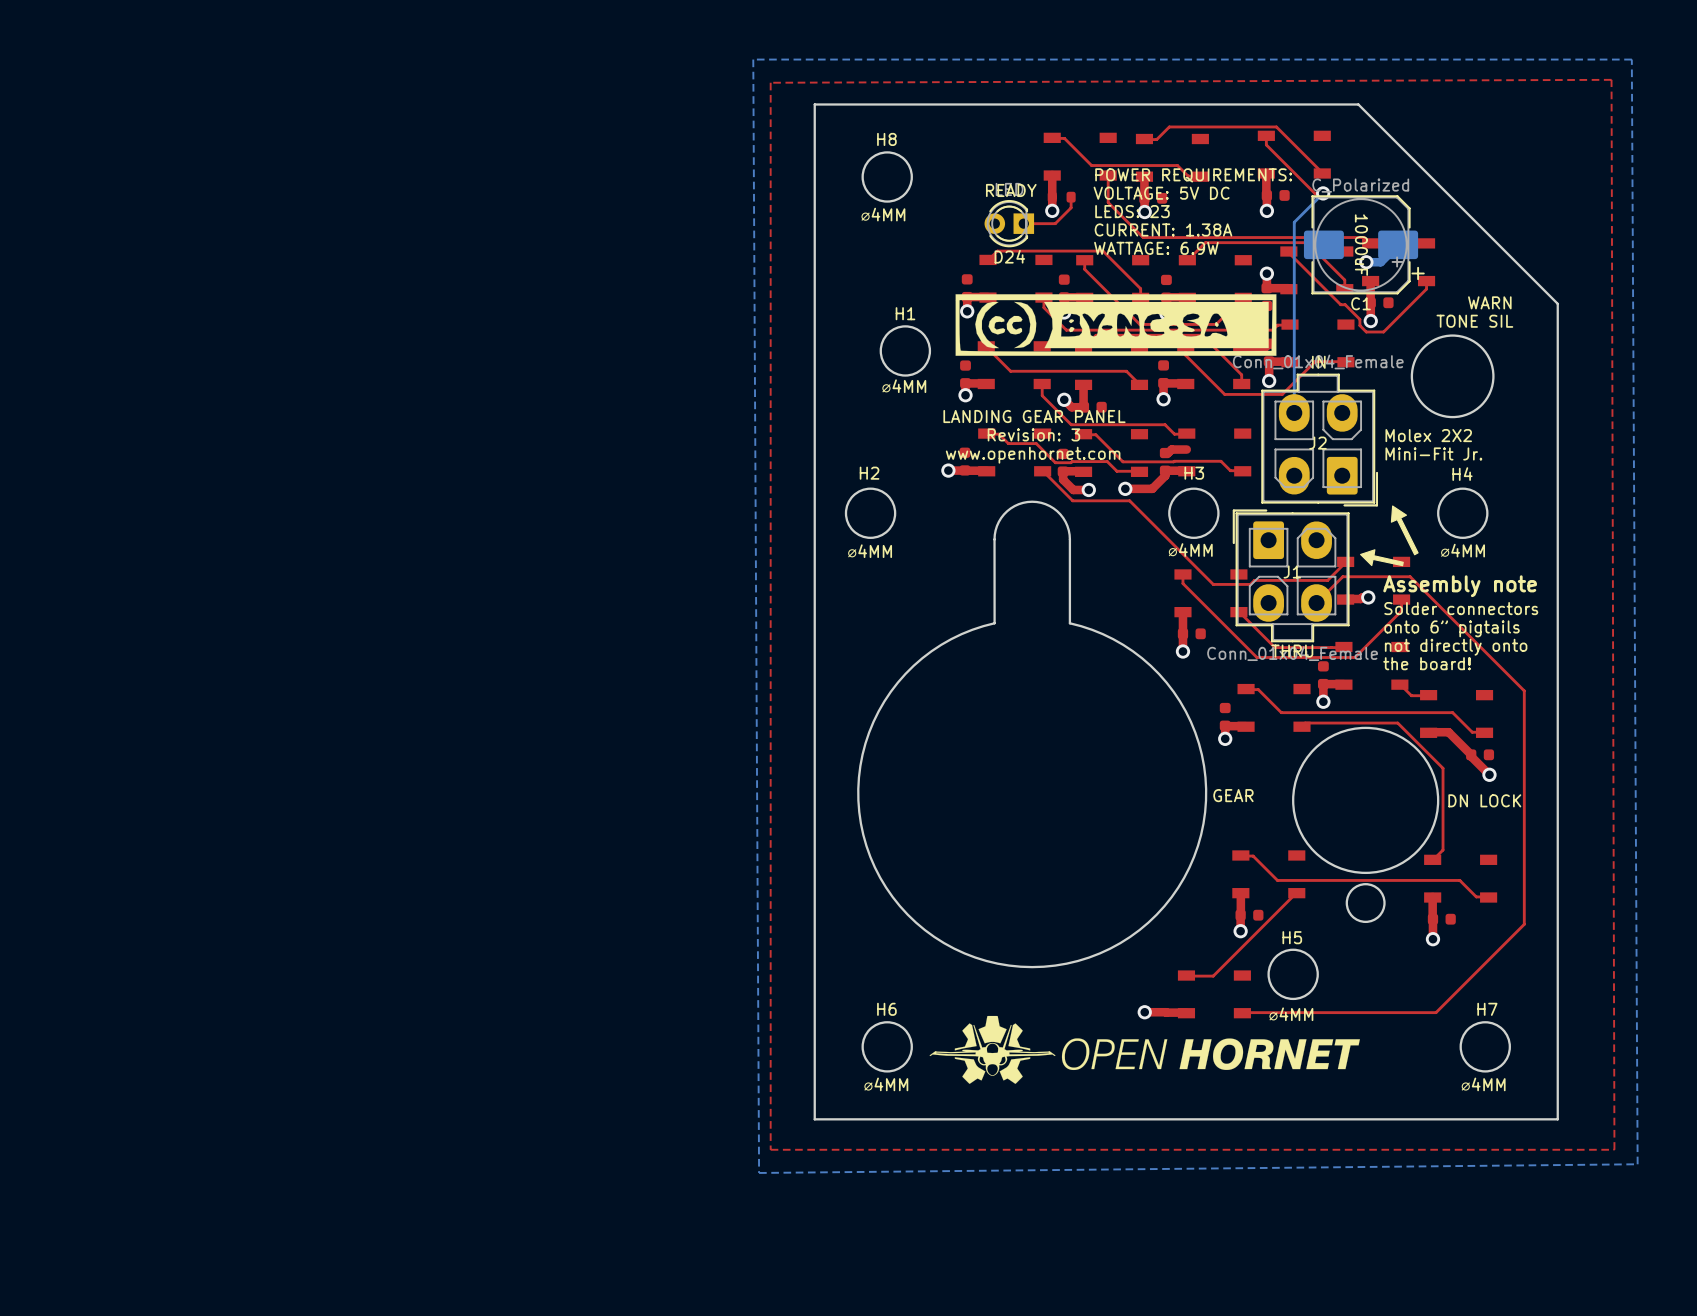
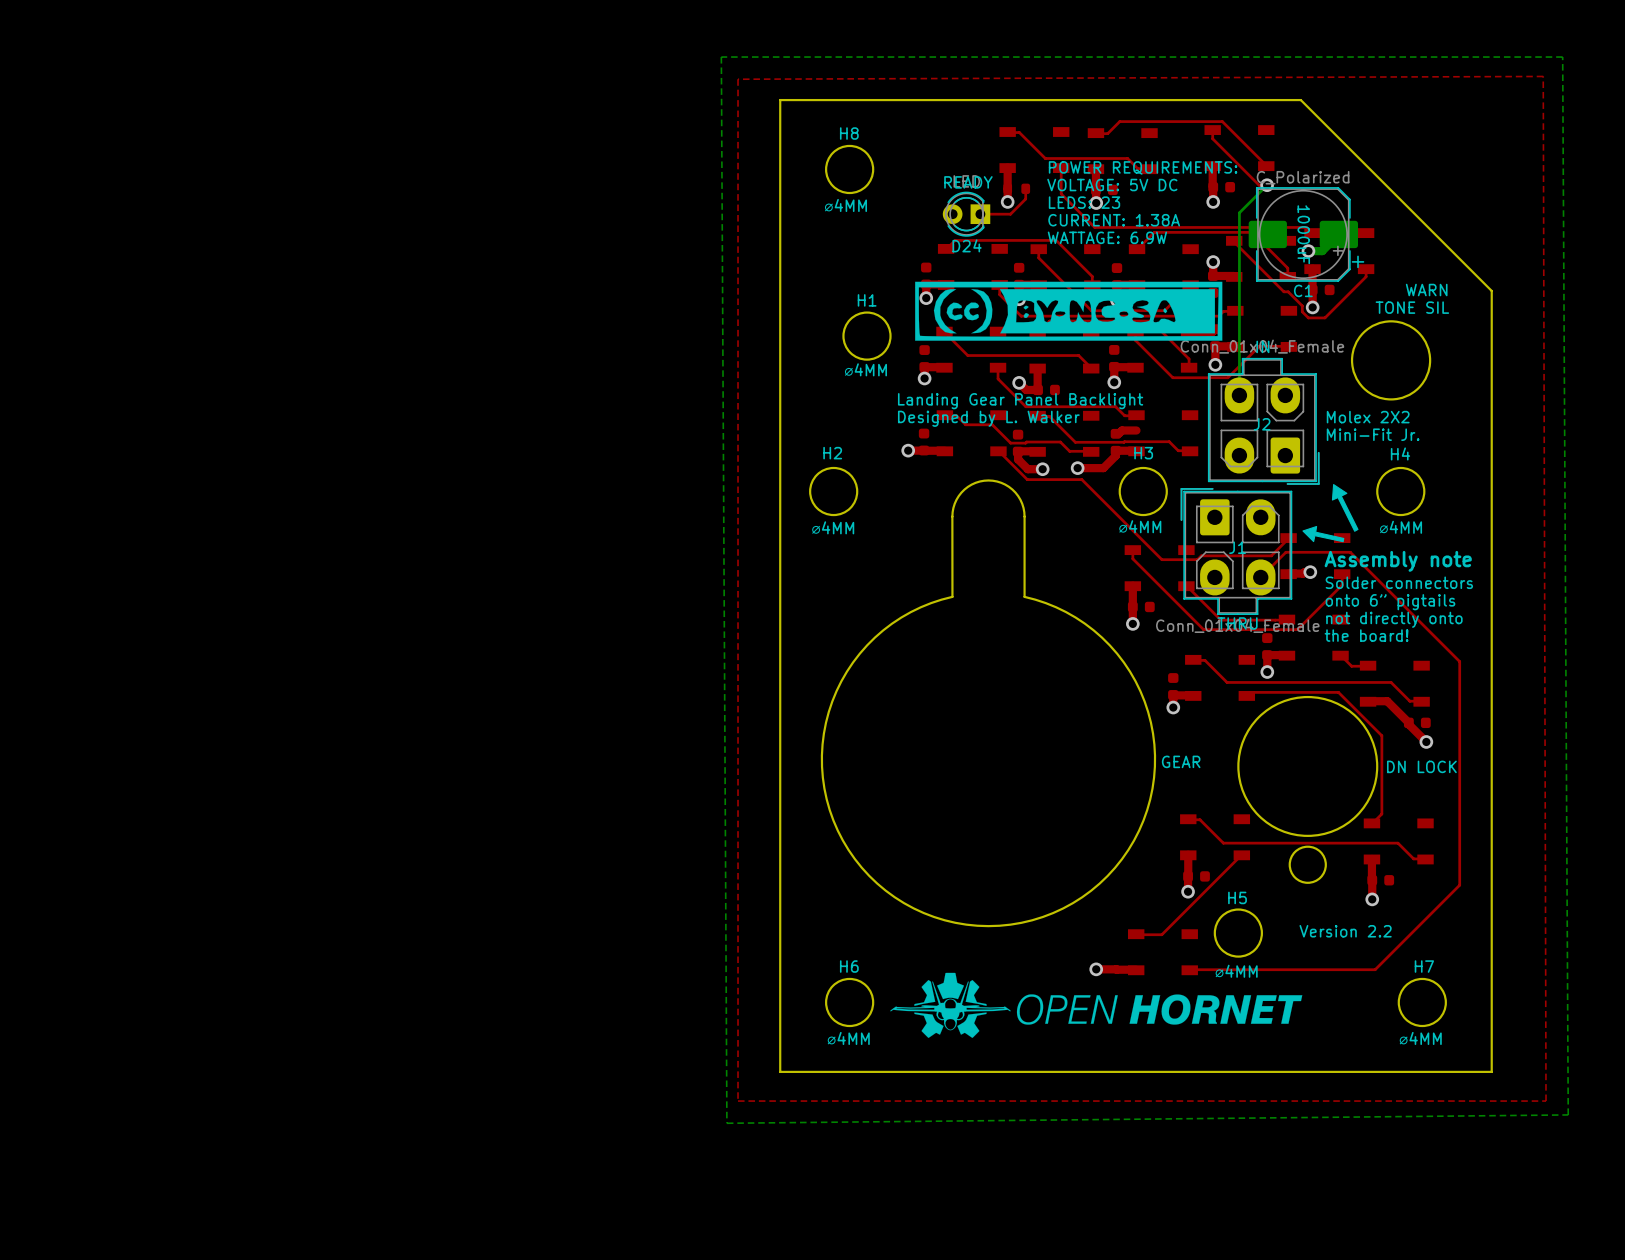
text: LANDING GEAR PANEL (1034, 416) -> none
text: none -> Landing Gear Panel Backlight (1020, 401)
text: Revision: 3 (1033, 434) -> none
text: none -> Designed by L. Walker (988, 418)
text: www.openhornet.com (1033, 455) -> none
text: none -> Version 2.2 (1345, 931)

